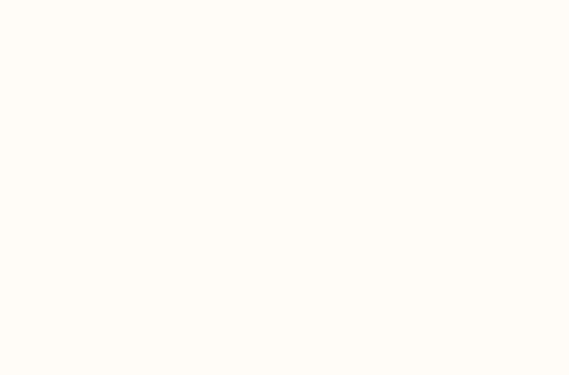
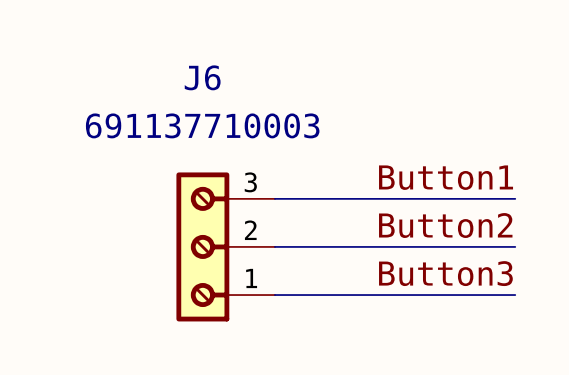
label: none -> Button1 (446, 177)
wire: none -> (274, 198) (515, 198)
label: none -> Button2 (445, 225)
J6: none -> 691137710003 (225, 246)
wire: none -> (274, 246) (515, 246)
label: none -> Button3 (445, 273)
wire: none -> (274, 295) (515, 295)

